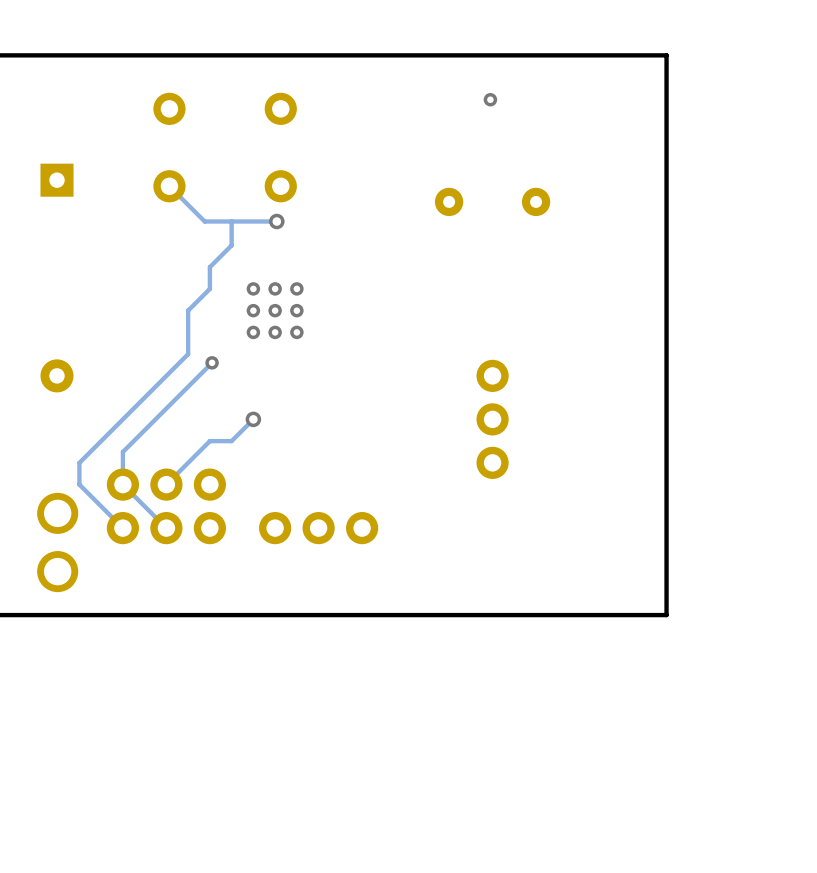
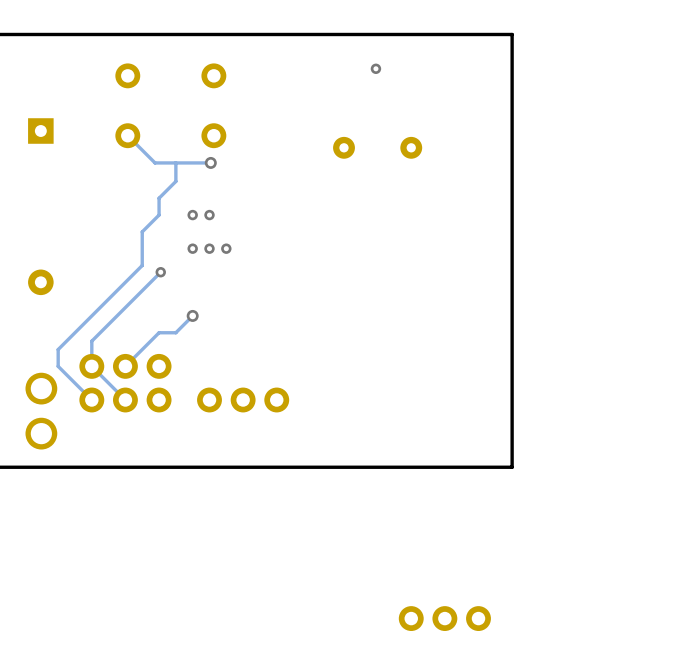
via: (296, 288) -> none
via: (253, 310) -> none
via: (275, 310) -> none
via: (296, 310) -> none
part rotation: 0° (492, 419) -> 90° clockwise (444, 618)
part position: (492, 419) -> (444, 618)

